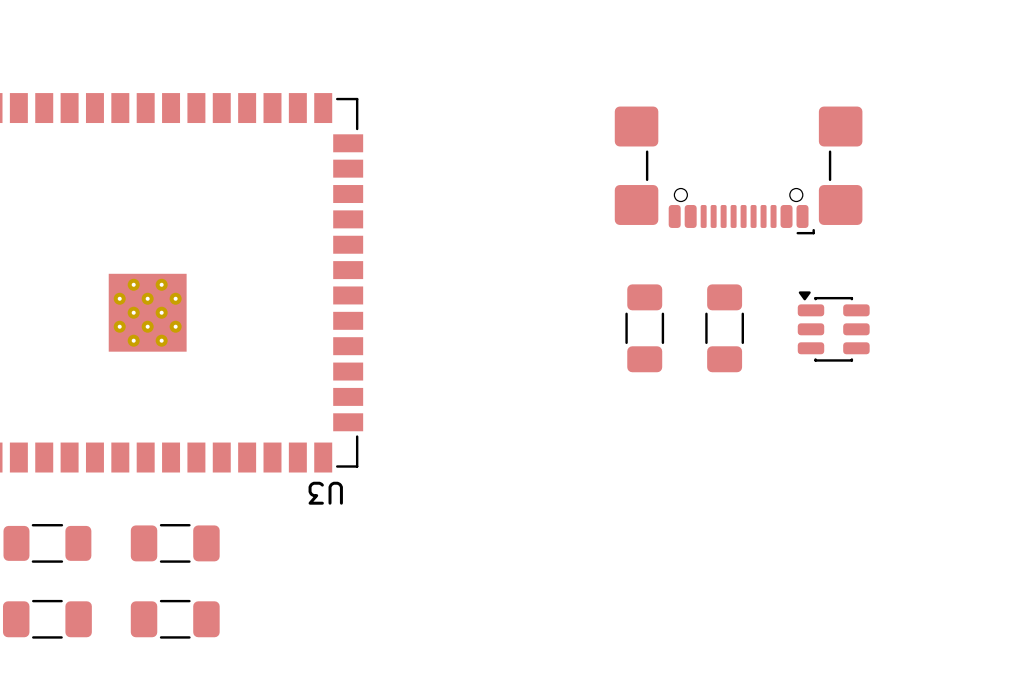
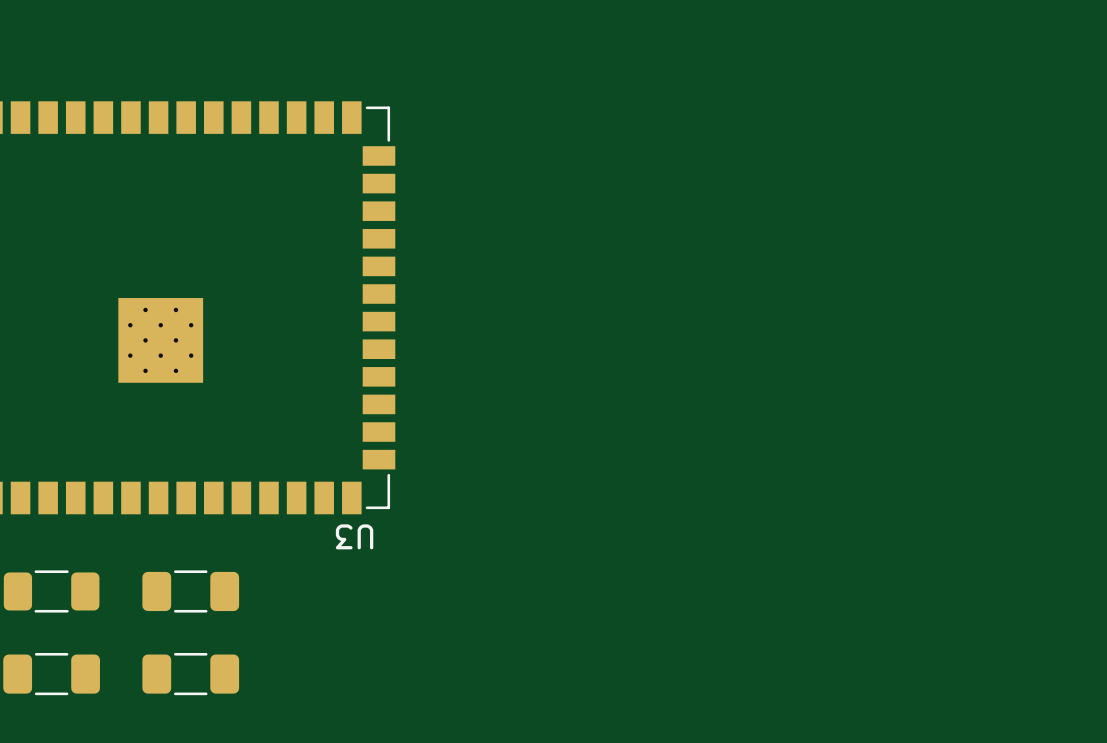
part: (738, 170) -> none
part: (833, 326) -> none
part: (644, 328) -> none
part: (724, 328) -> none

